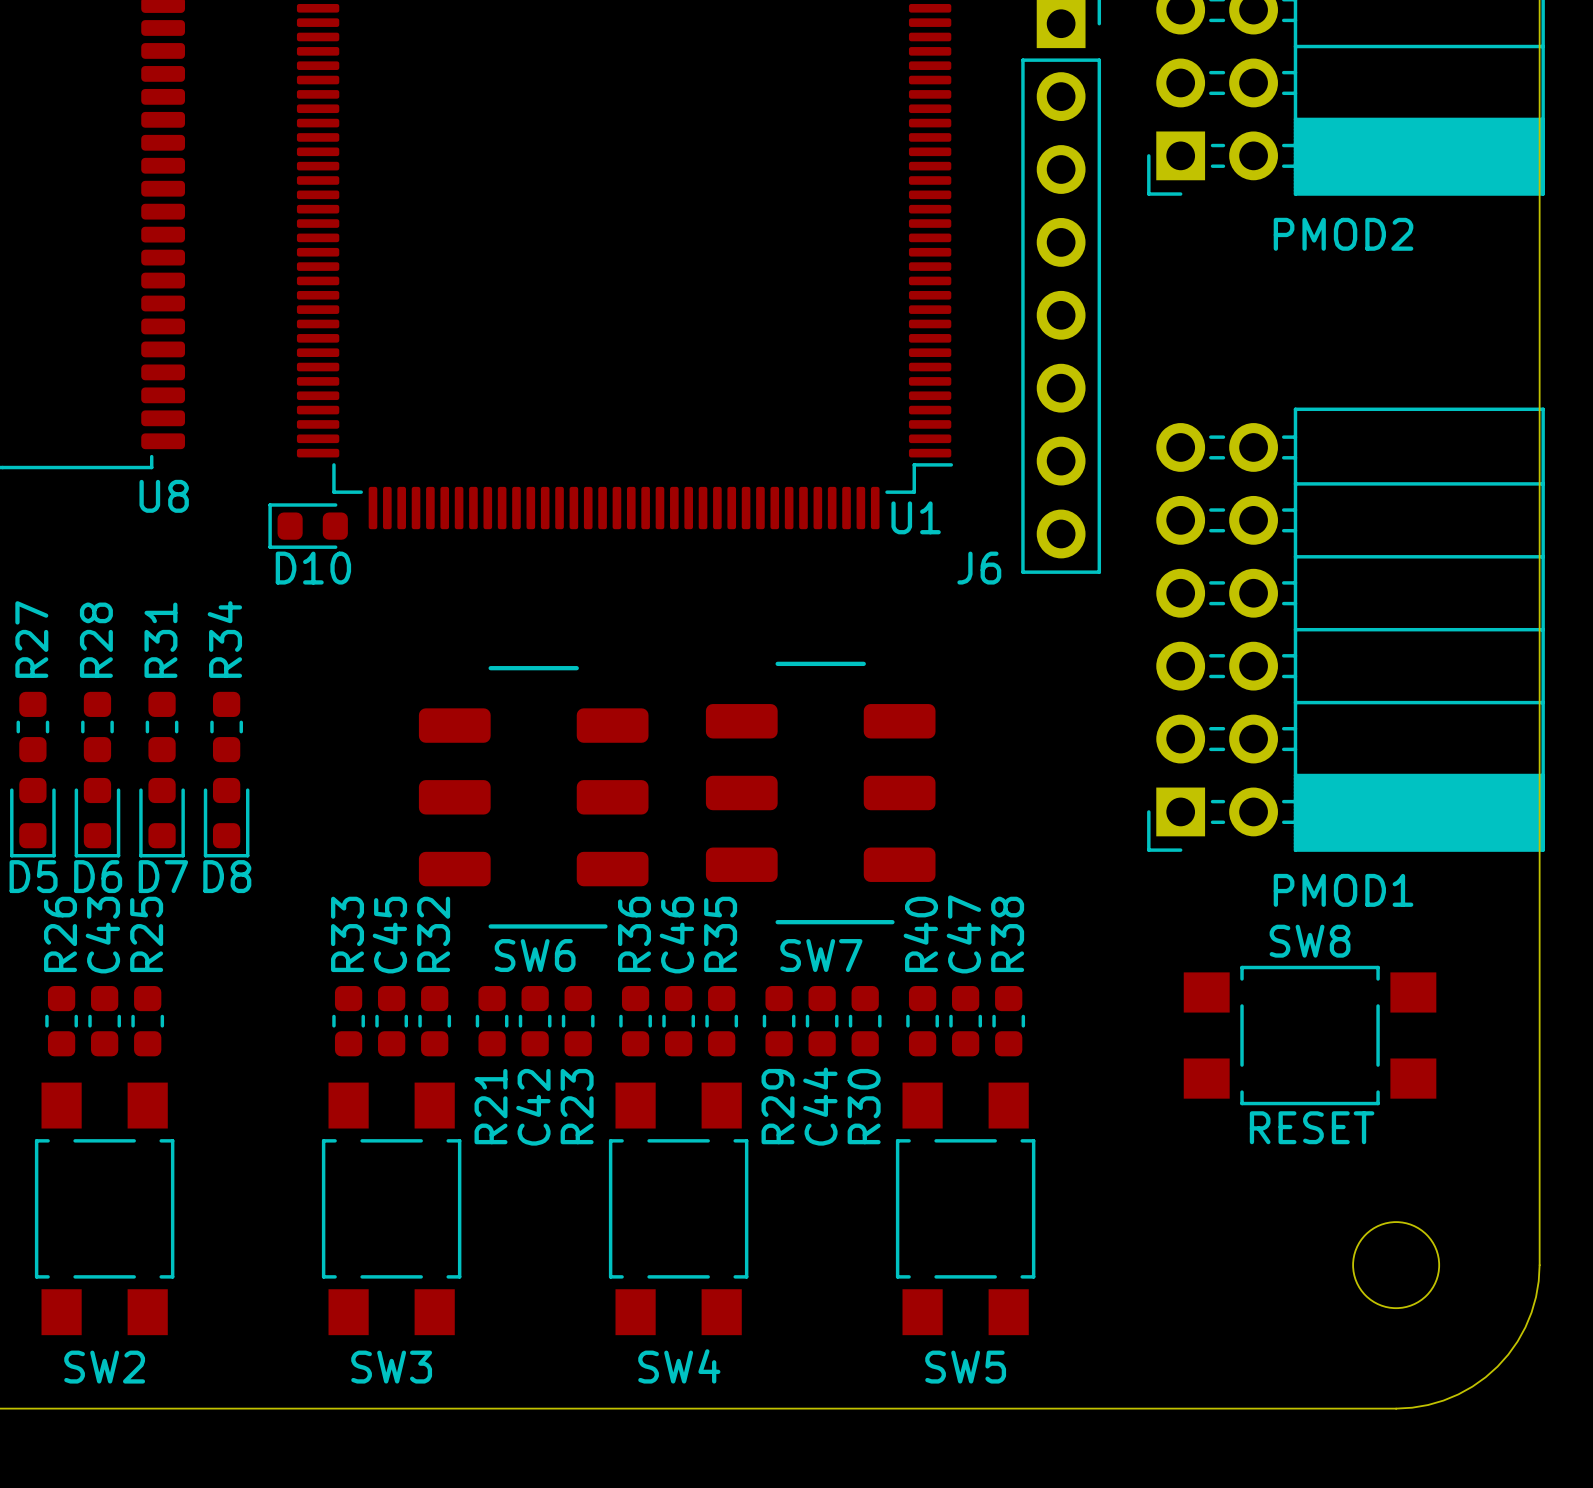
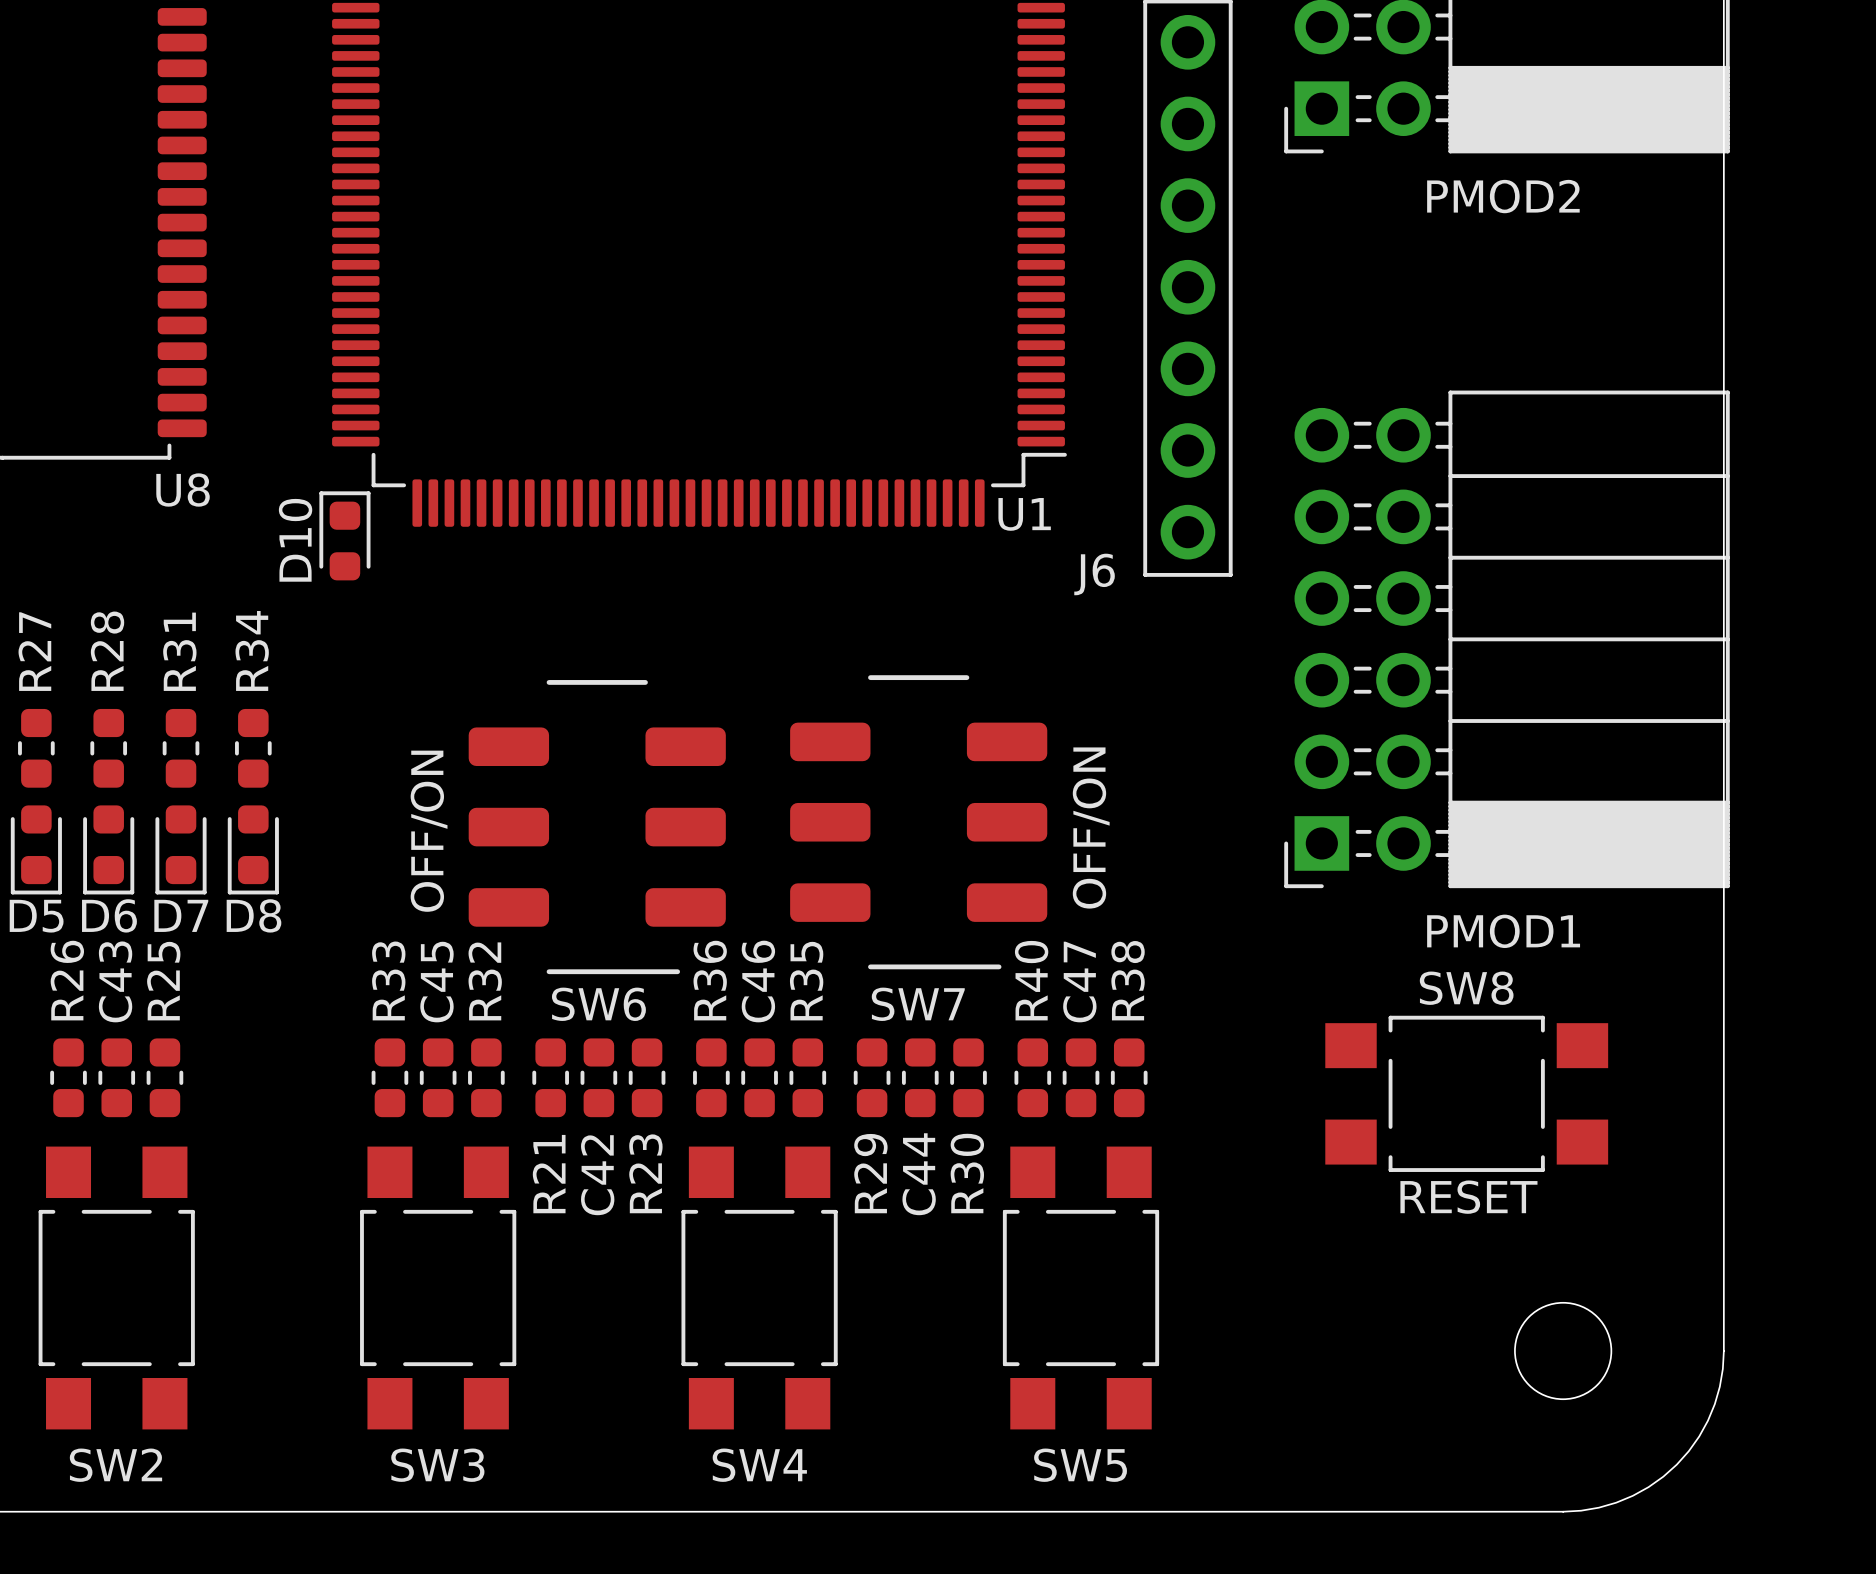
D10 rotation: 0° (308, 526) -> 90° clockwise (344, 535)
text: none -> OFF/ON (1091, 828)
text: none -> OFF/ON (429, 831)

